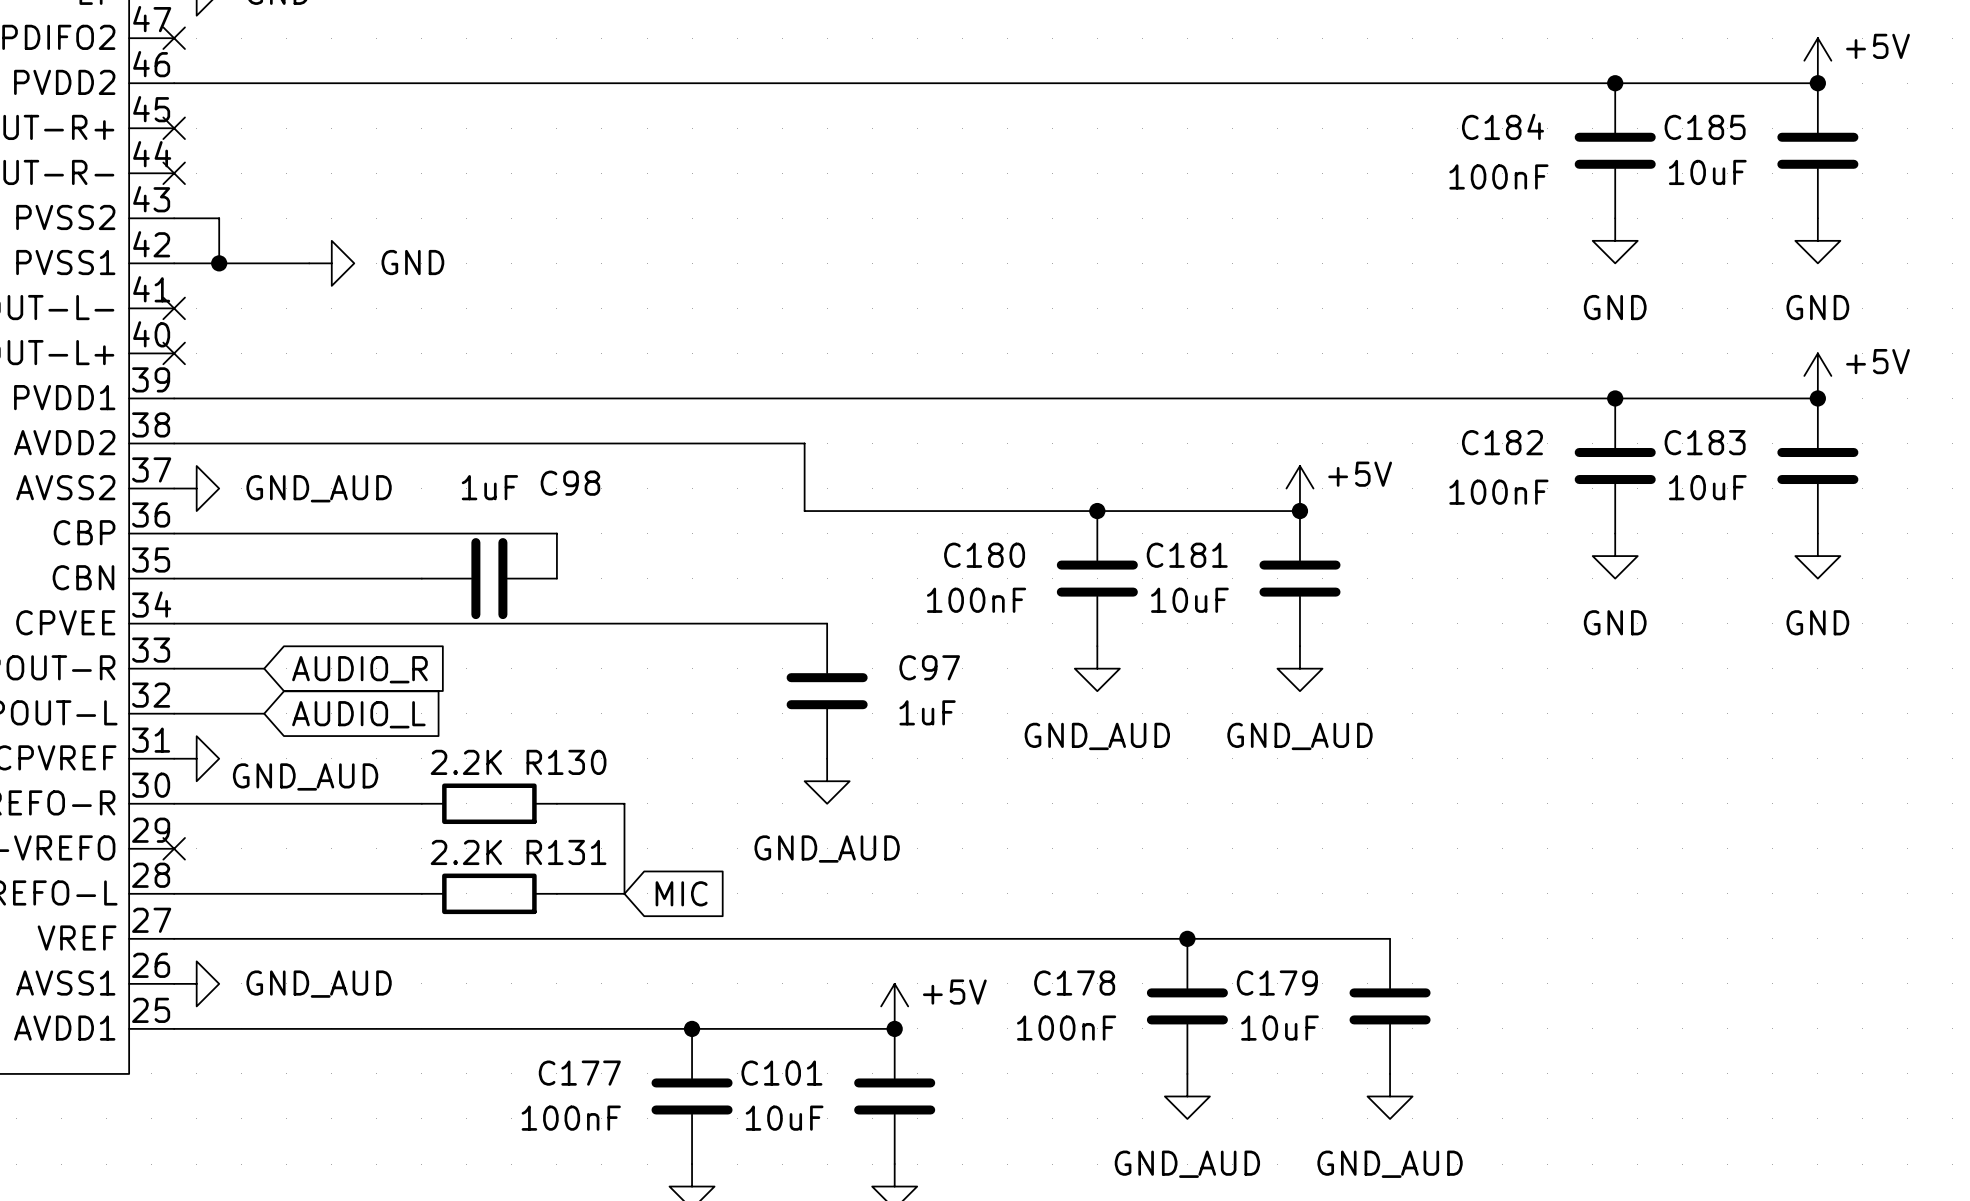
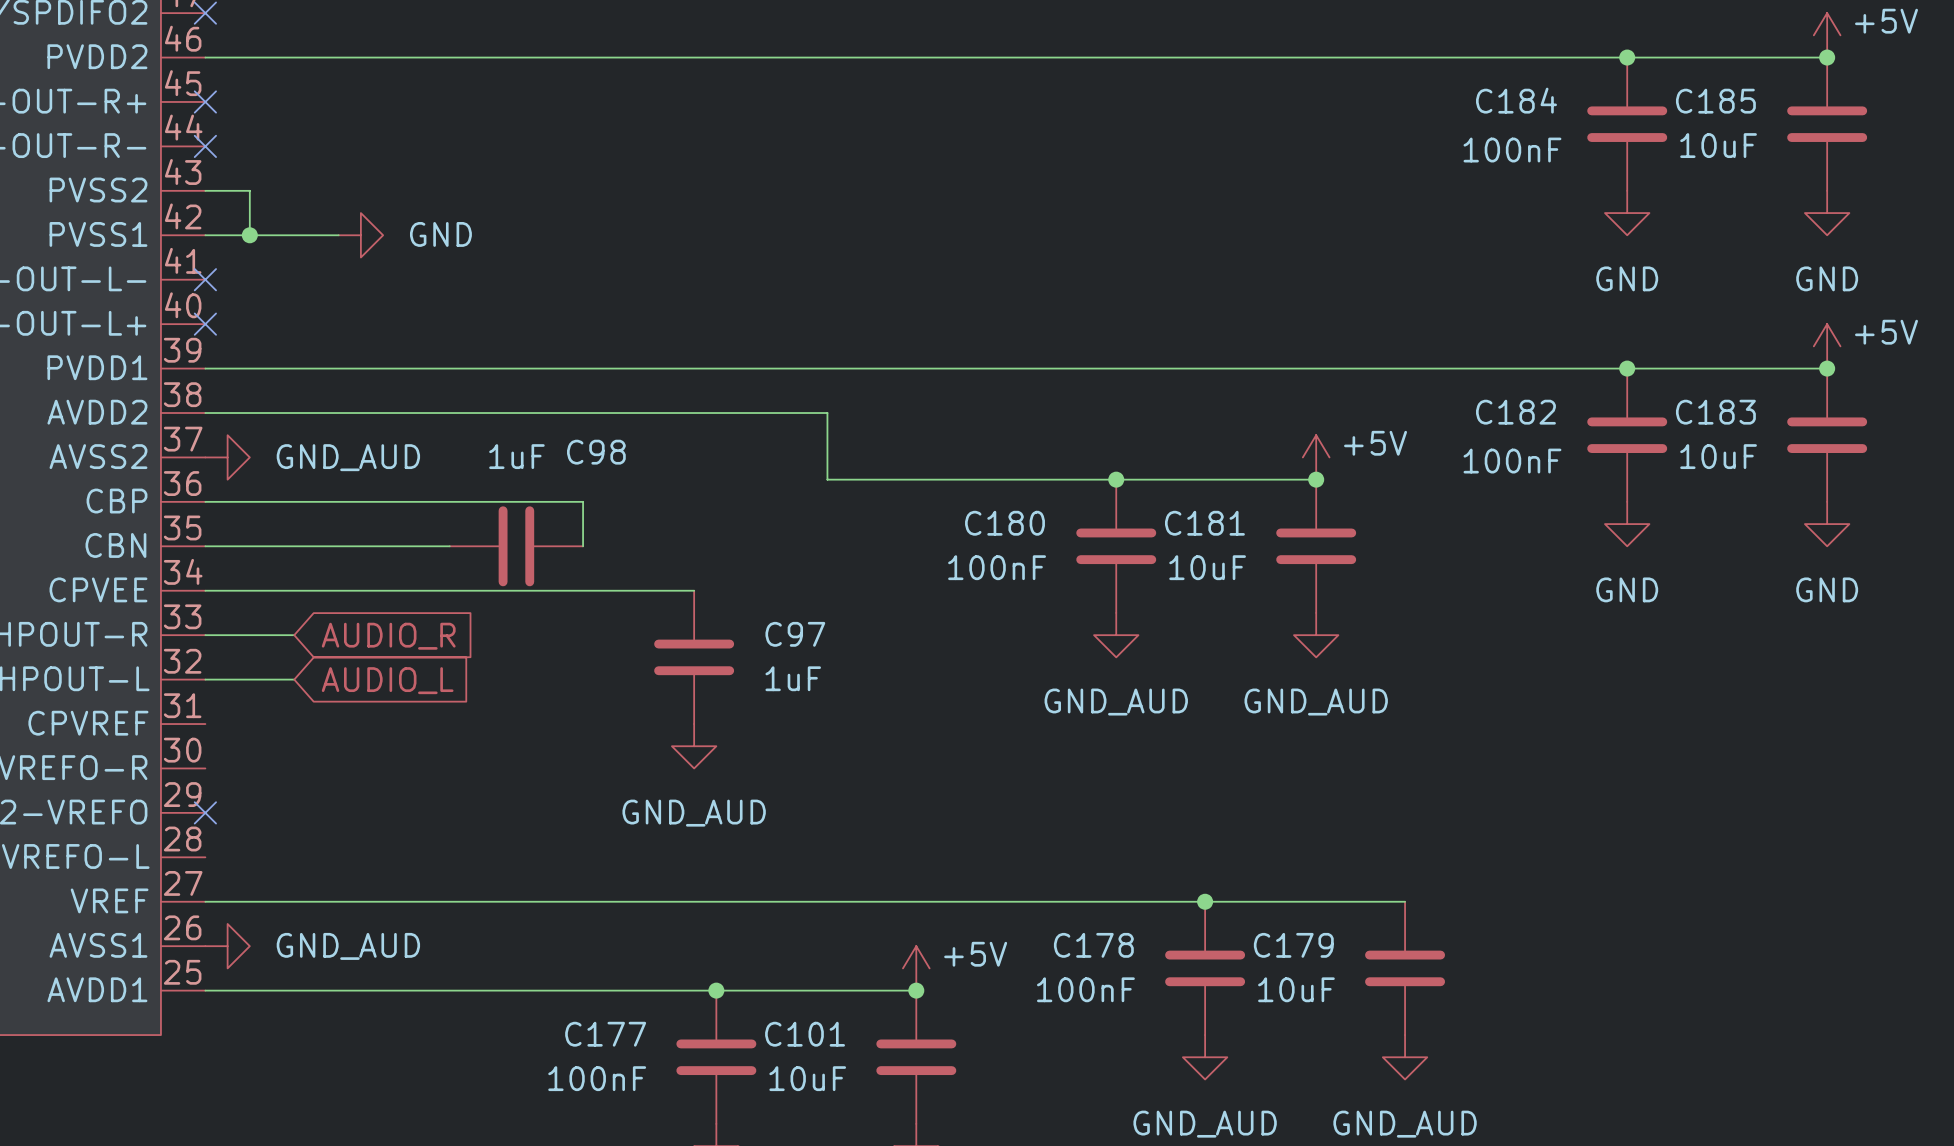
wire: (669, 623) (827, 623) -> none
C97 position: (827, 691) -> (694, 657)
power symbol: GND_AUD (196, 758) -> none
power symbol position: GND_AUD (827, 781) -> GND_AUD (694, 746)
wire: (174, 803) (421, 803) -> none
R130: 2.2K (489, 803) -> none
wire: (556, 803) (624, 803) (624, 893) (556, 893) -> none
wire: (174, 893) (421, 893) -> none
R131: 2.2K (489, 893) -> none
global label: MIC (681, 893) -> none

